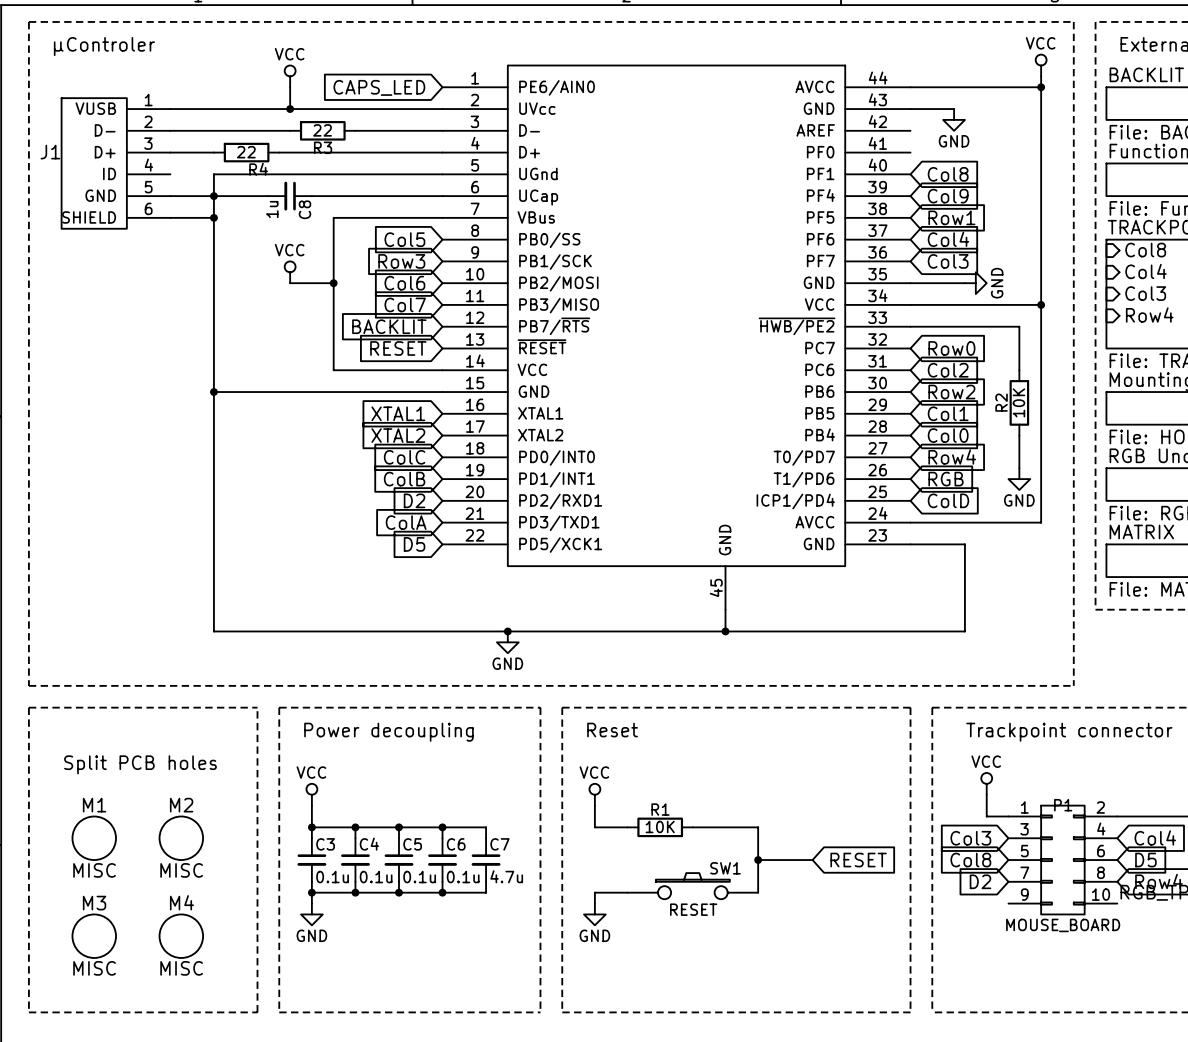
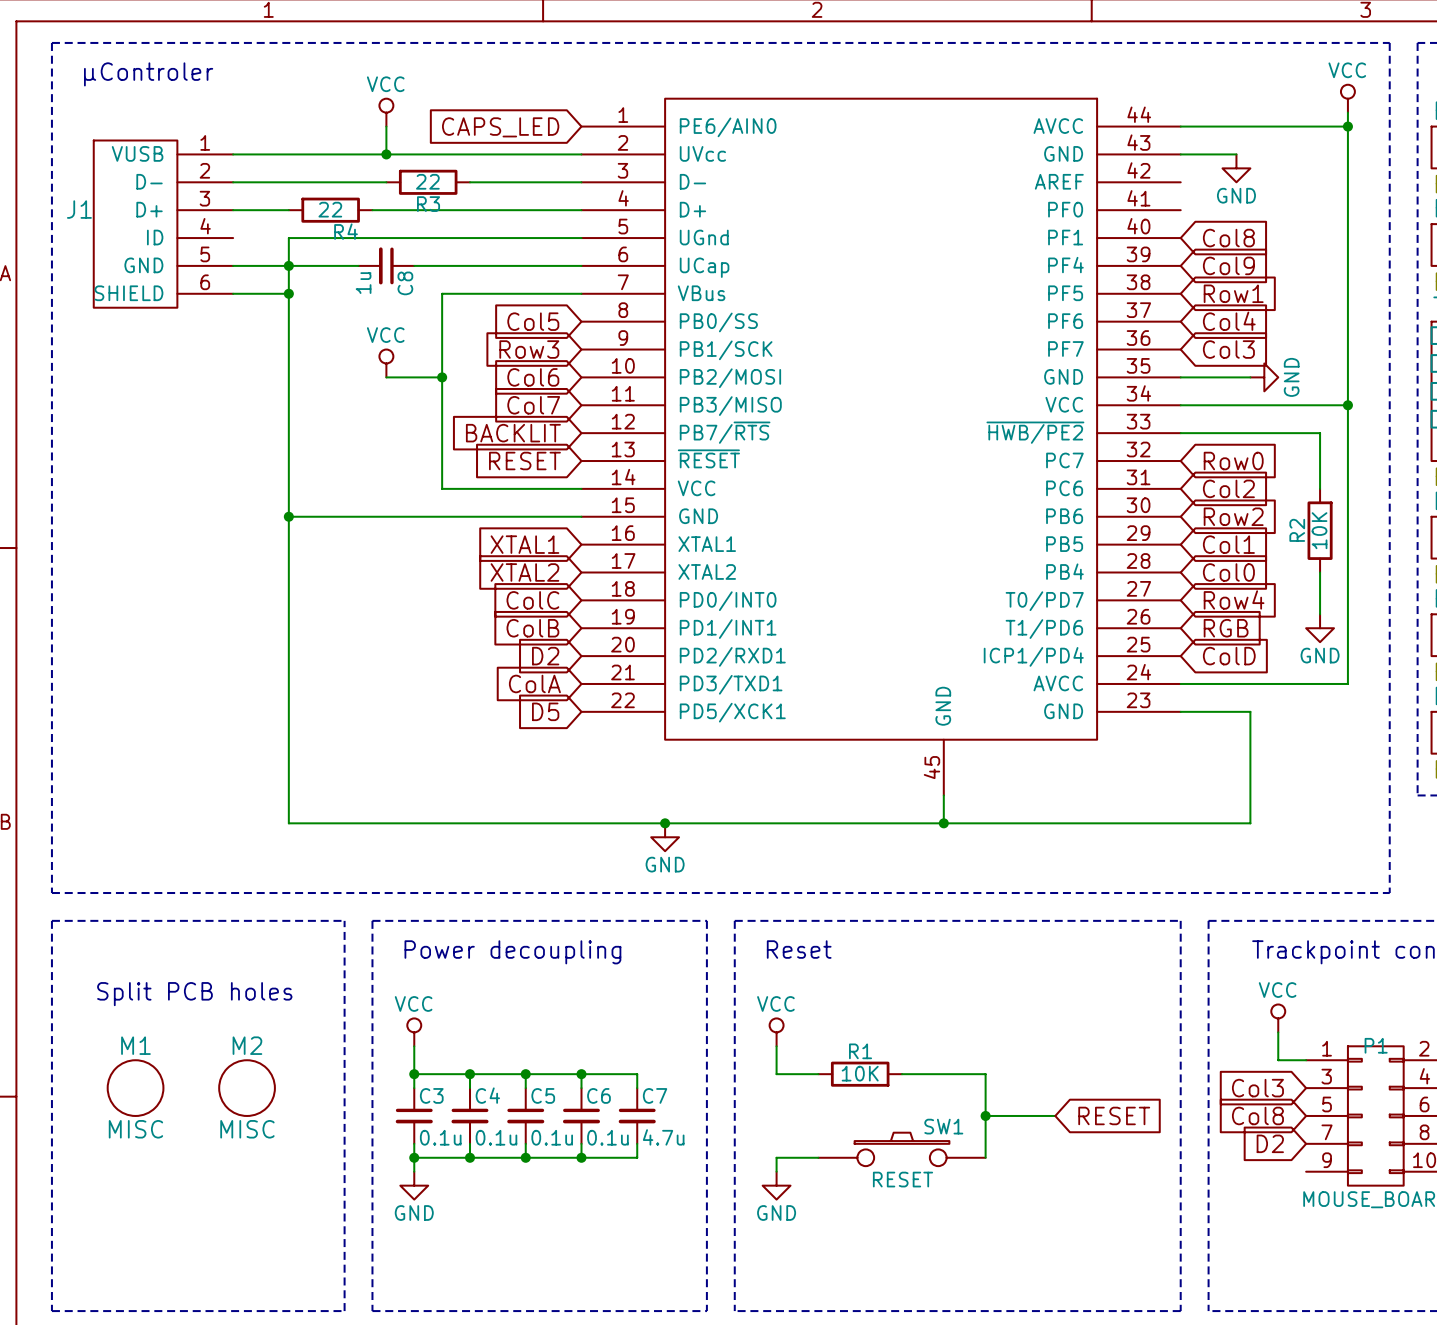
M3: MISC (94, 936) -> none
M4: MISC (181, 936) -> none

